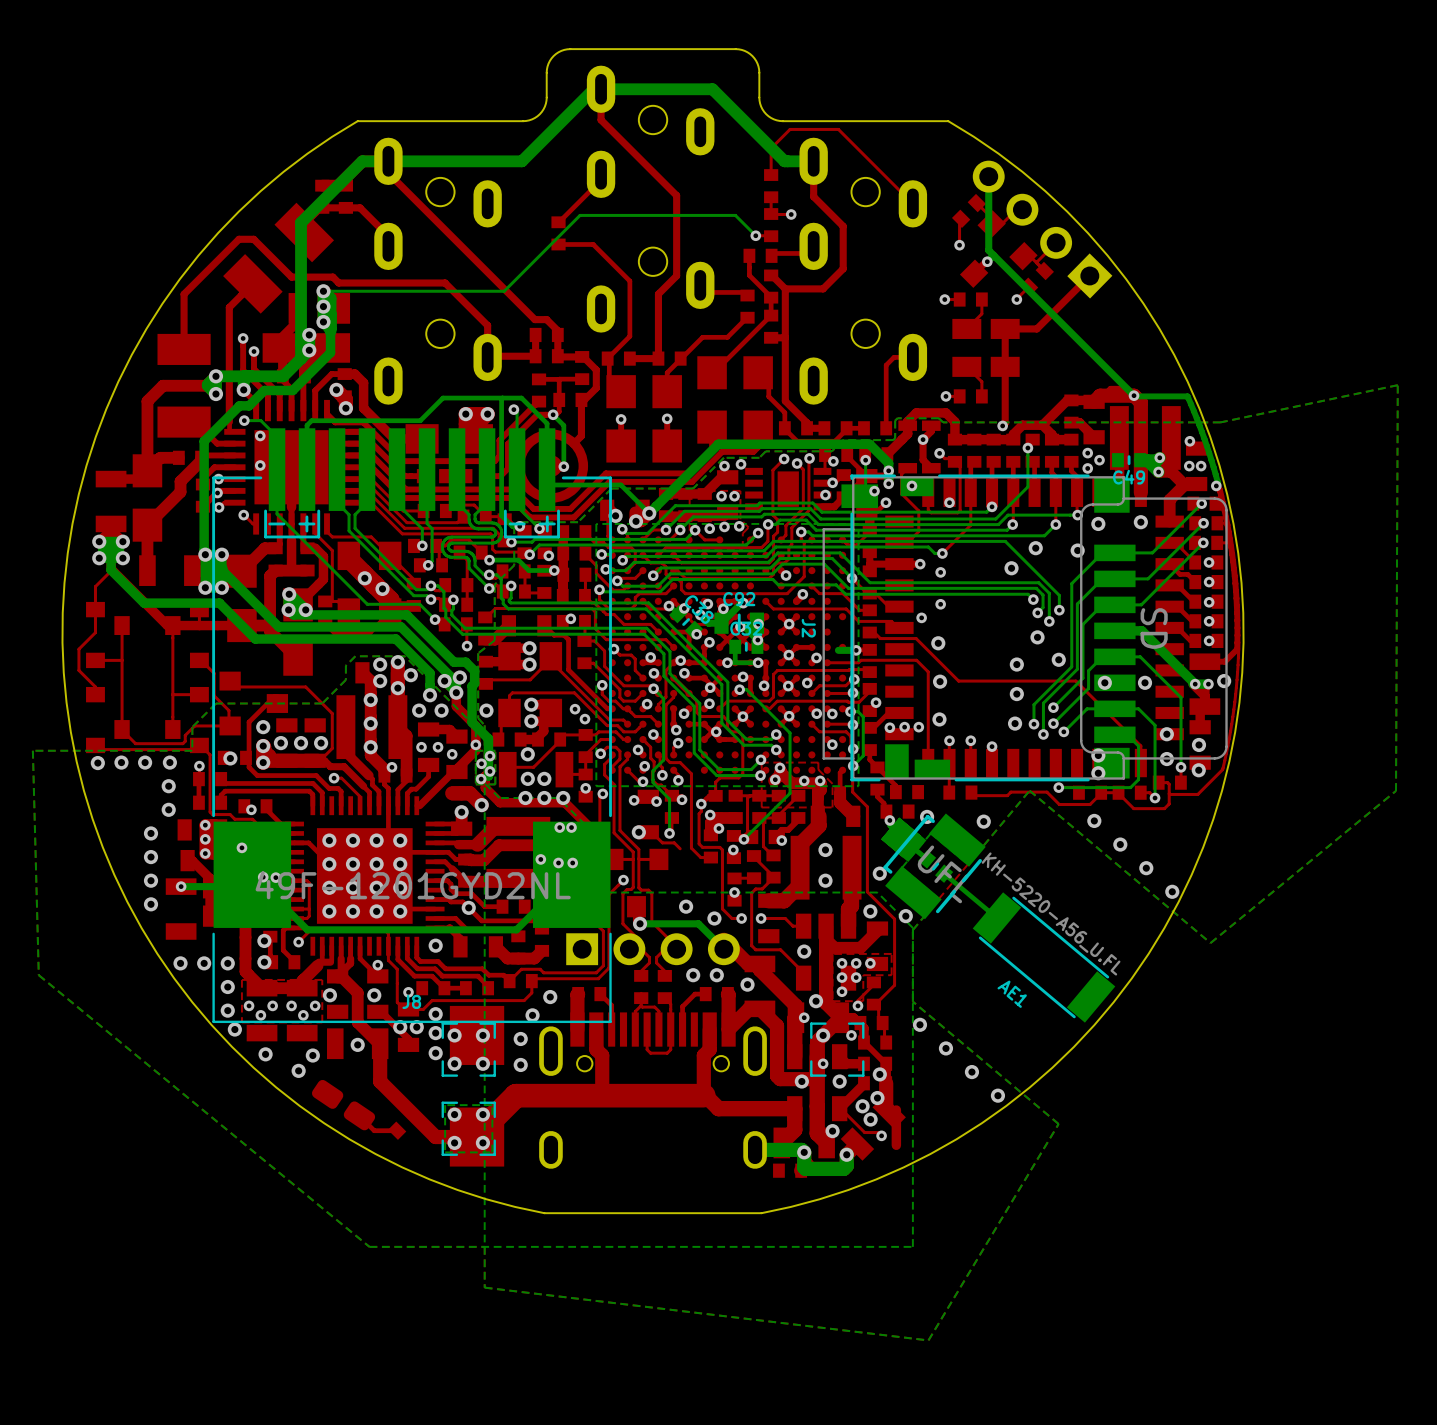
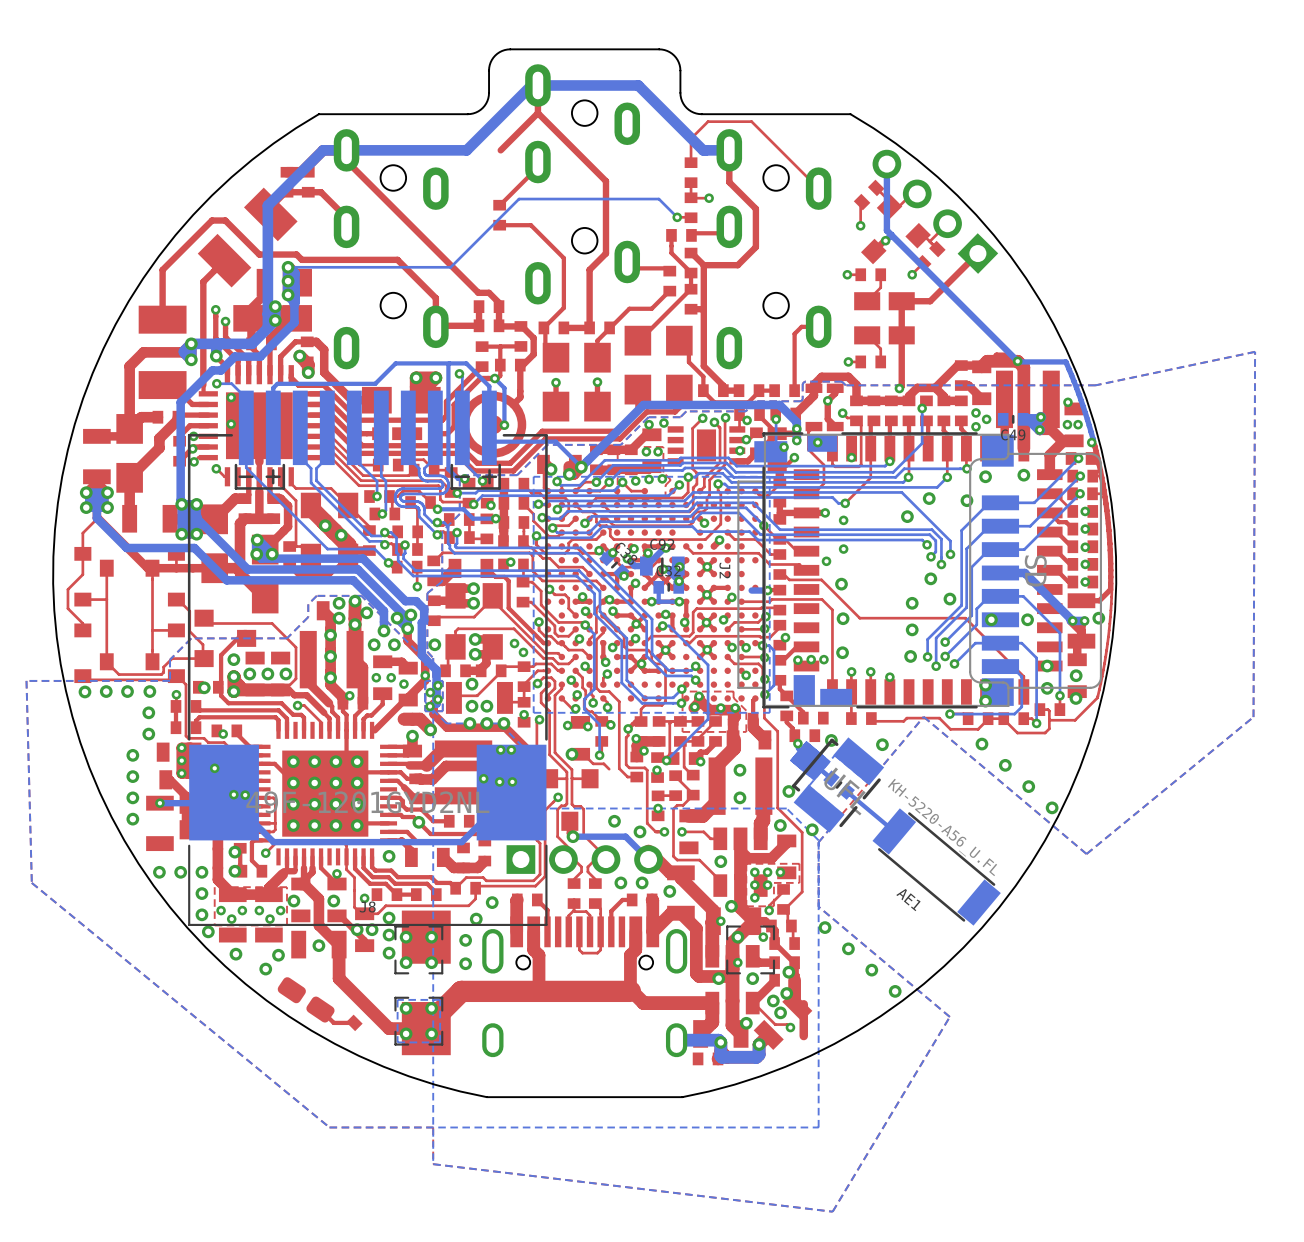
top track: none -> (537, 113) (500, 150)

